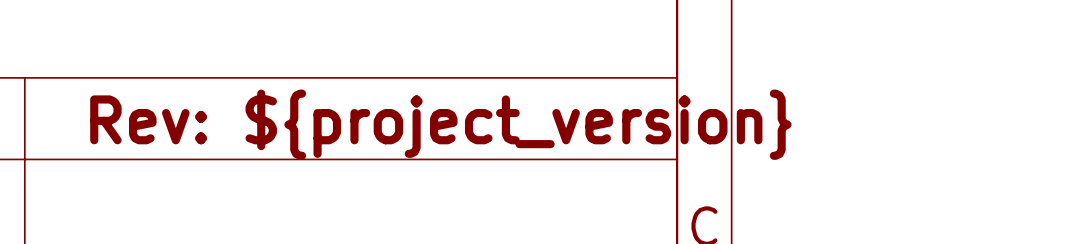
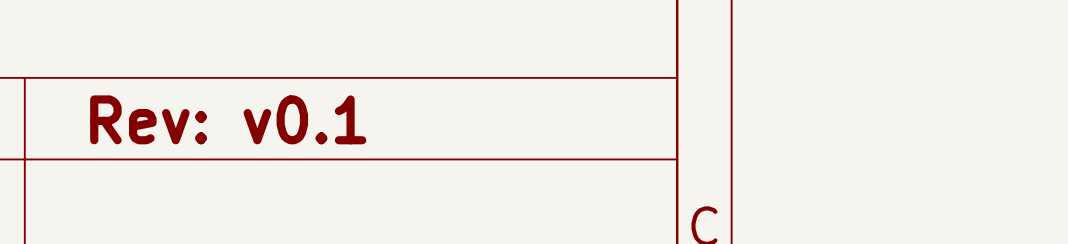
title block: Rev: ${project_version} (440, 124) -> Rev: v0.1 (228, 119)

